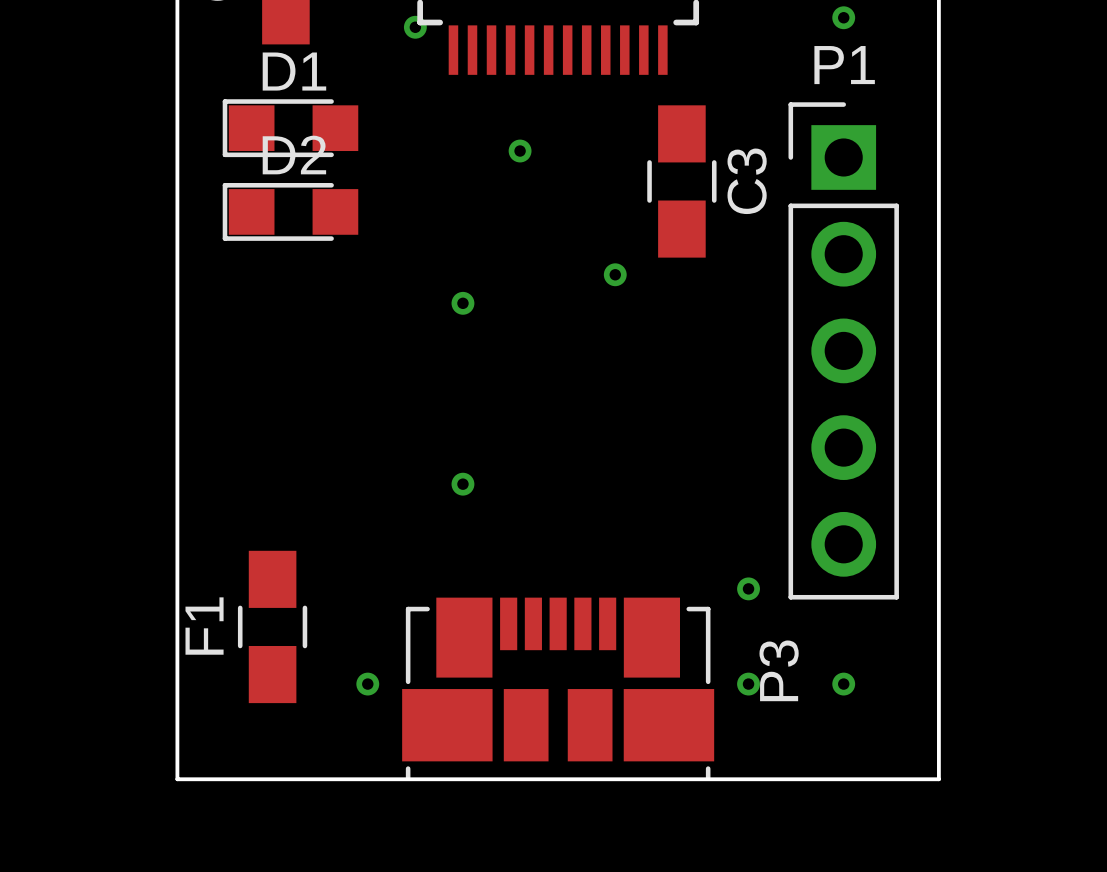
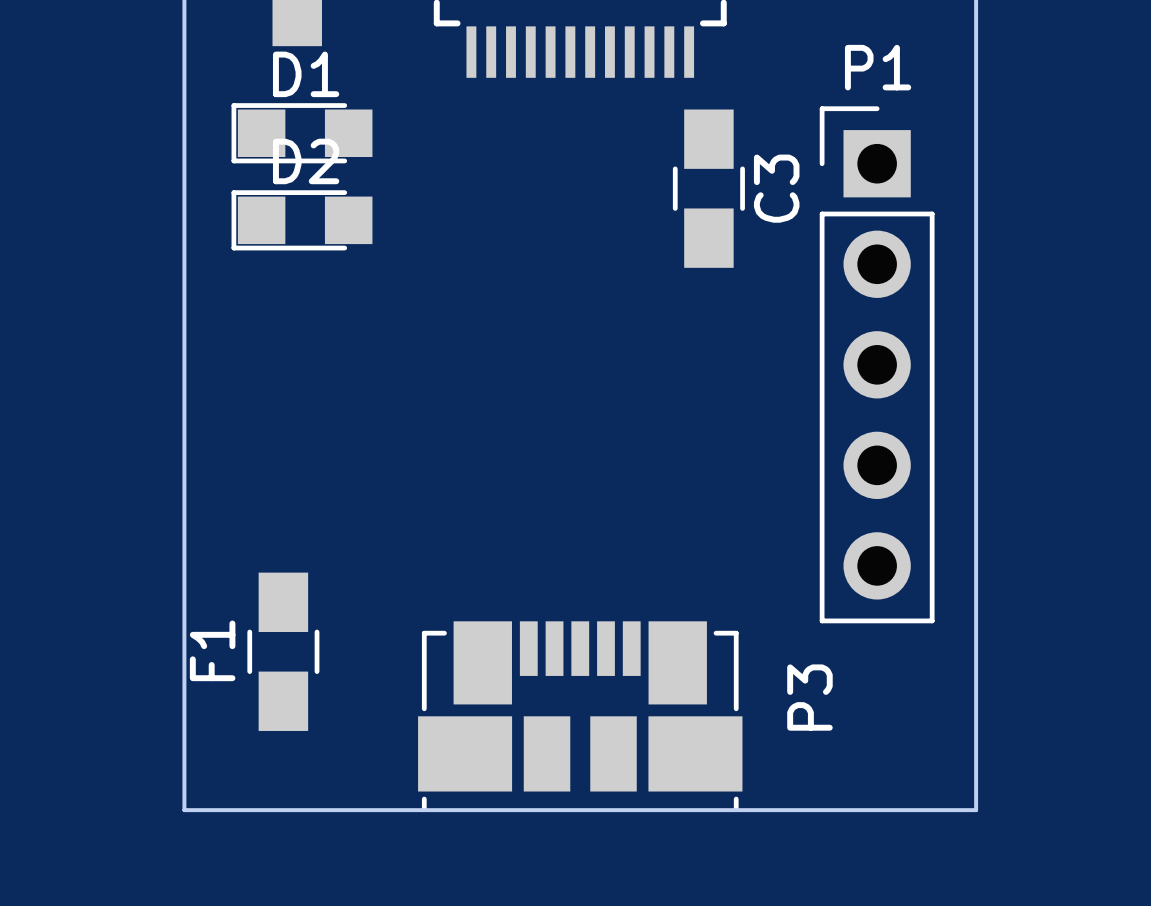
part: (843, 17) -> none
part: (415, 27) -> none
part: (520, 151) -> none
part: (615, 274) -> none
part: (462, 303) -> none
part: (462, 484) -> none
part: (748, 588) -> none
part: (367, 684) -> none
part: (748, 684) -> none
part: (843, 684) -> none

